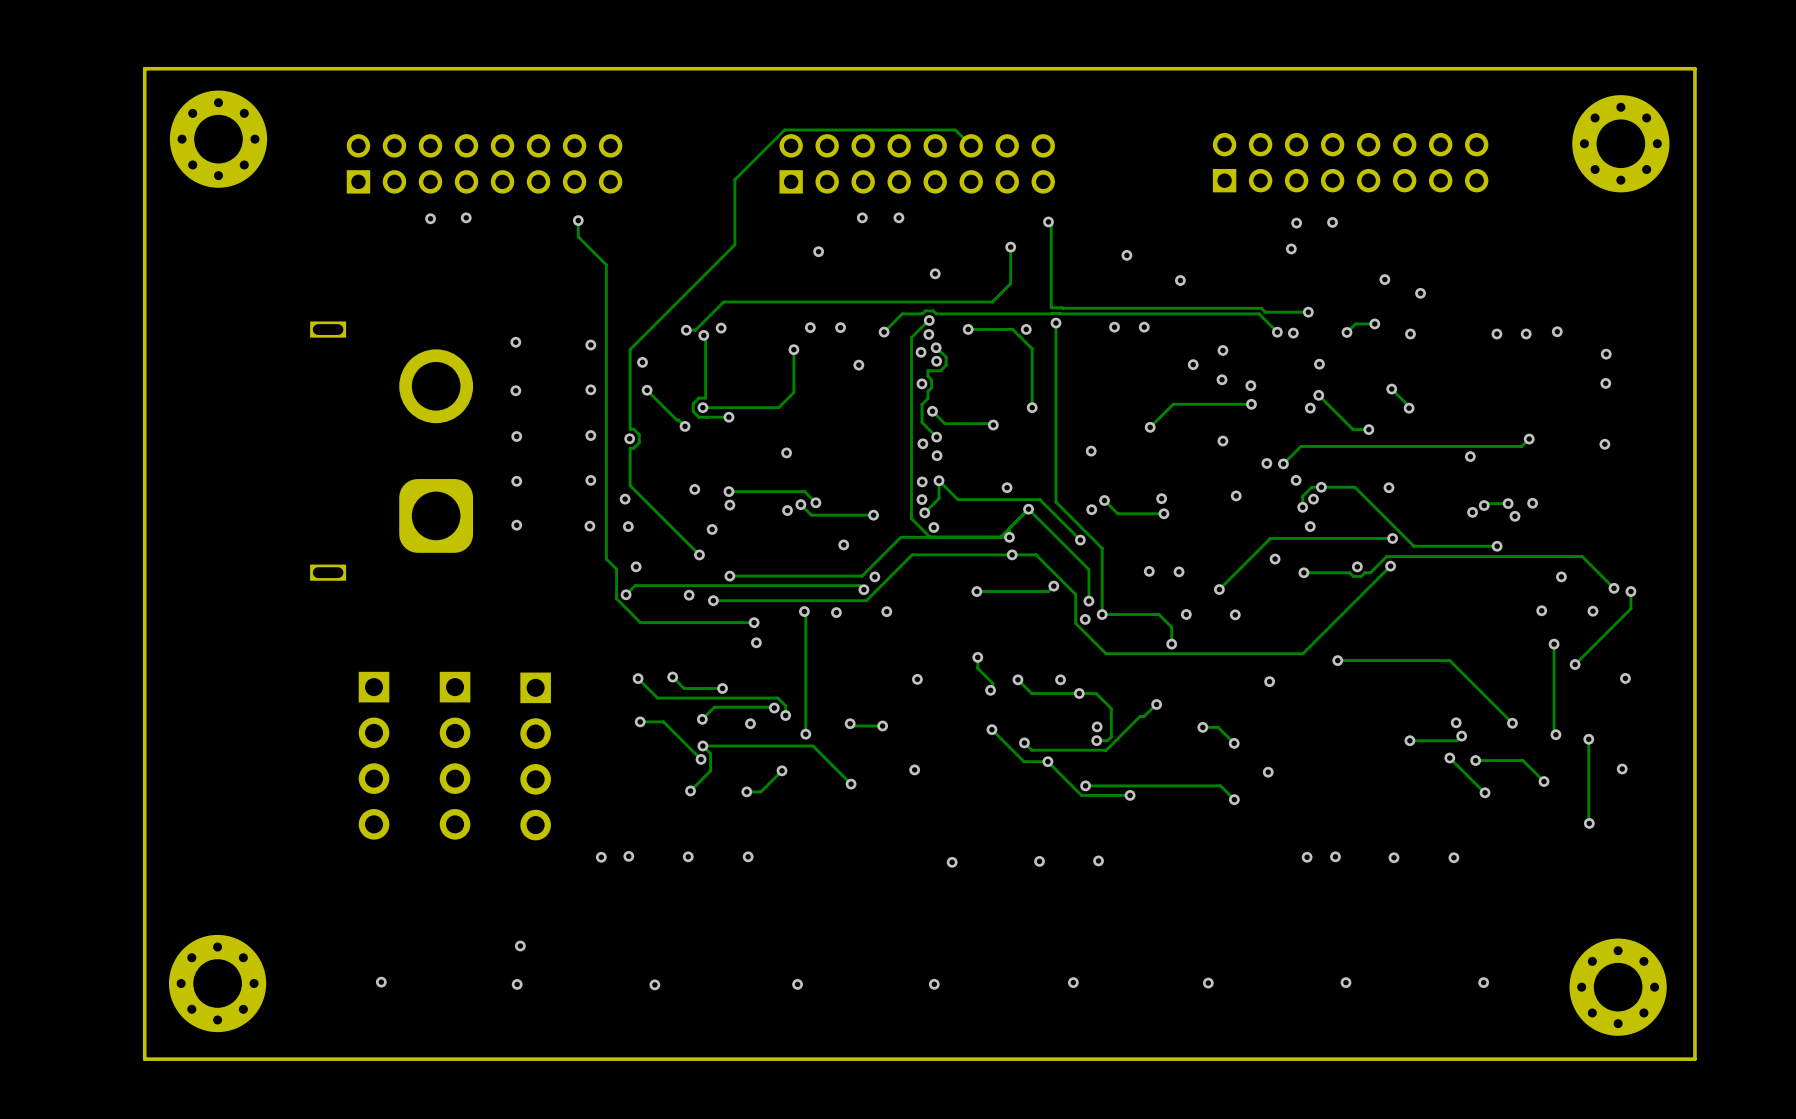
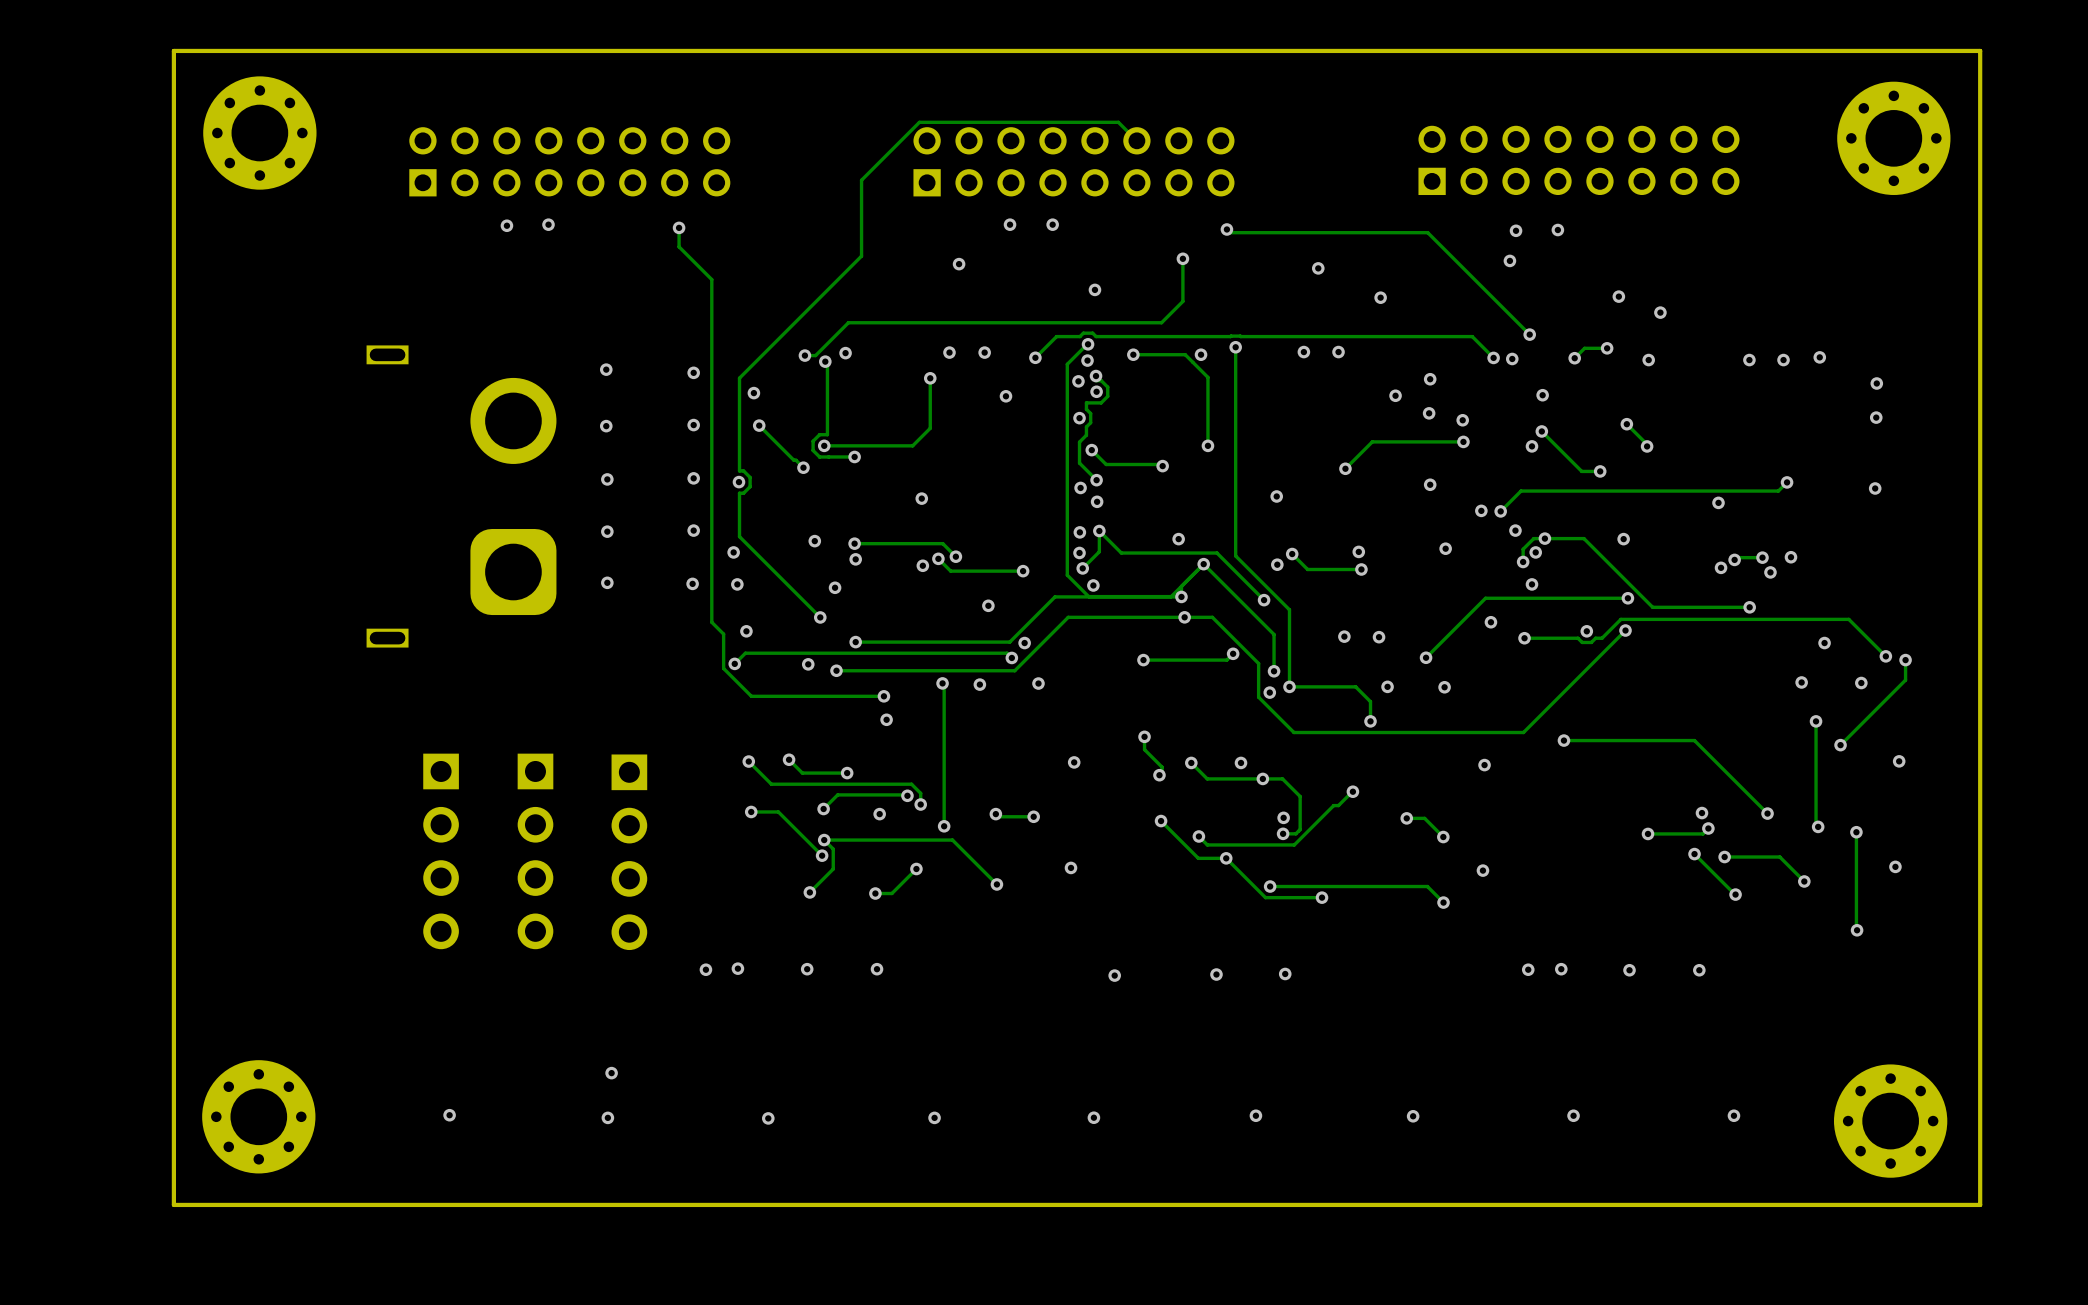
track: (1051, 224) (1051, 307) (1261, 308) (1265, 312) (1308, 312) -> (1230, 232) (1427, 232) (1529, 334)

